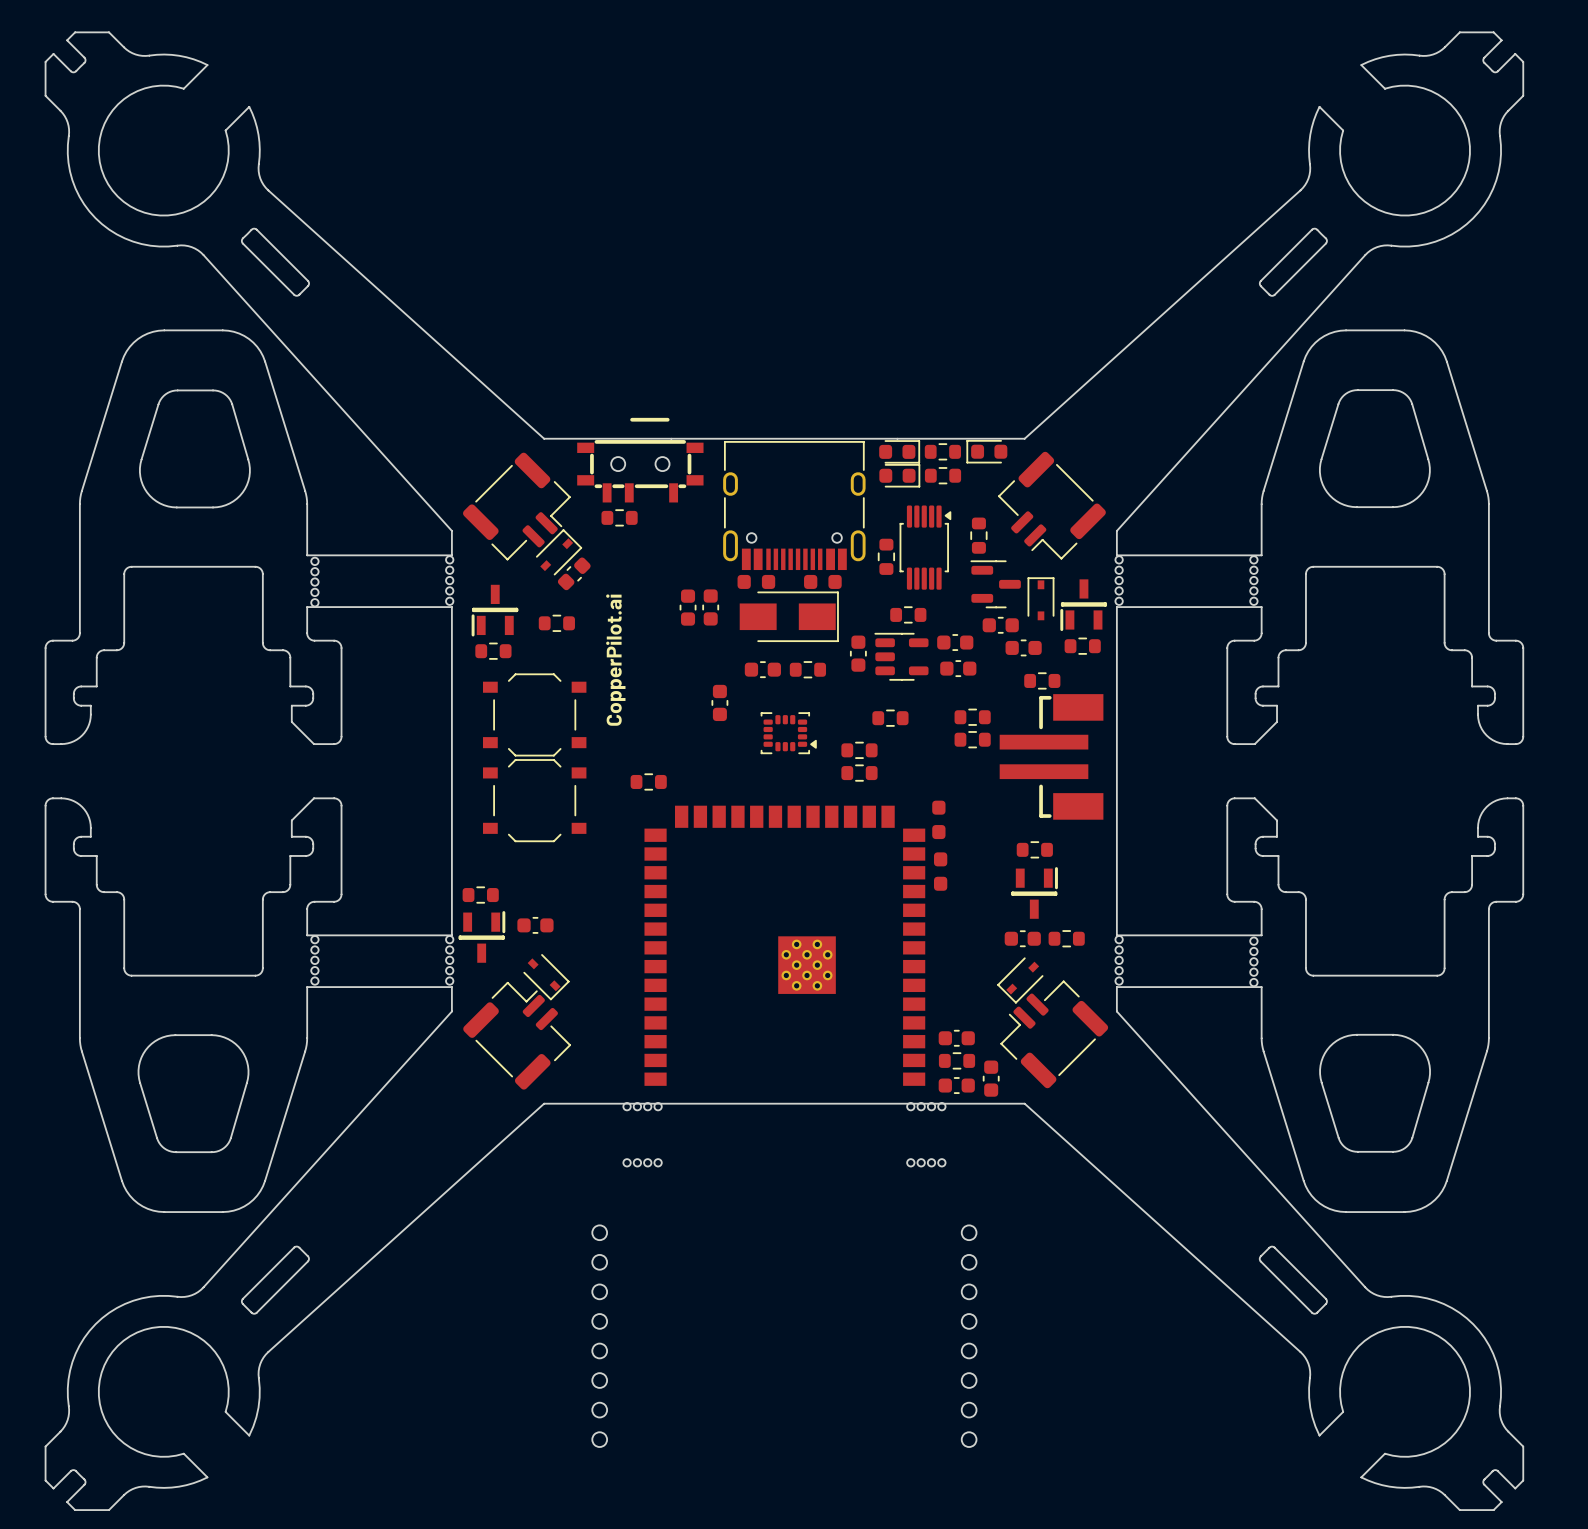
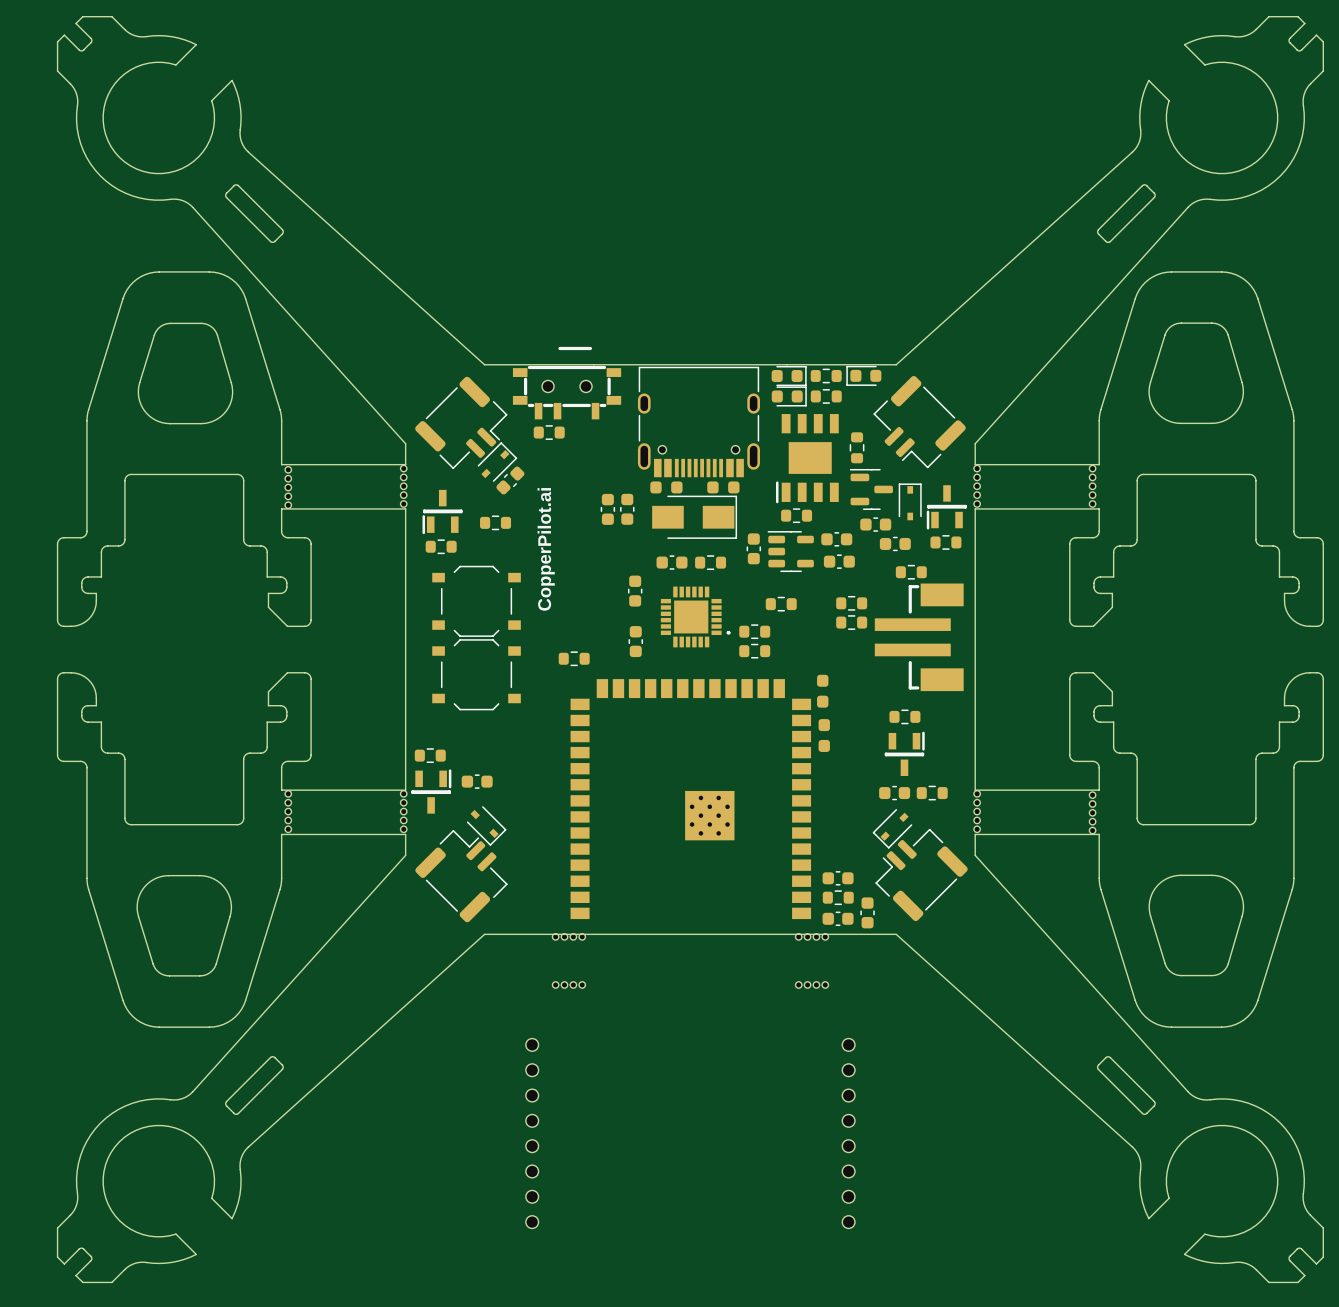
part footprint: [899, 505, 952, 590] -> [775, 414, 839, 504]
part: (886, 556) -> none
part footprint: [760, 712, 817, 755] -> [660, 586, 731, 648]
part: none -> (635, 641)

